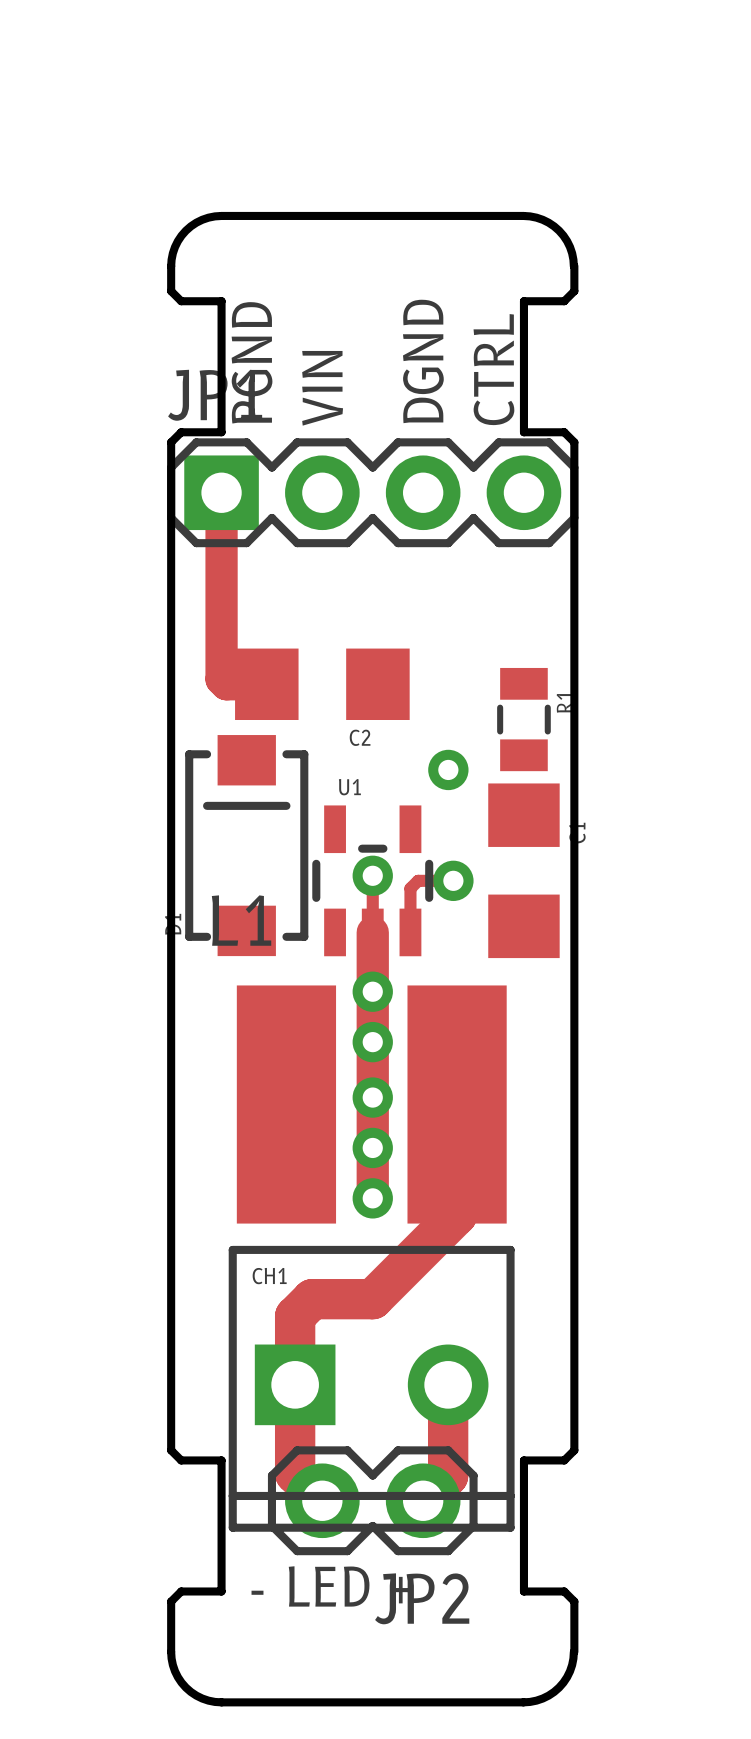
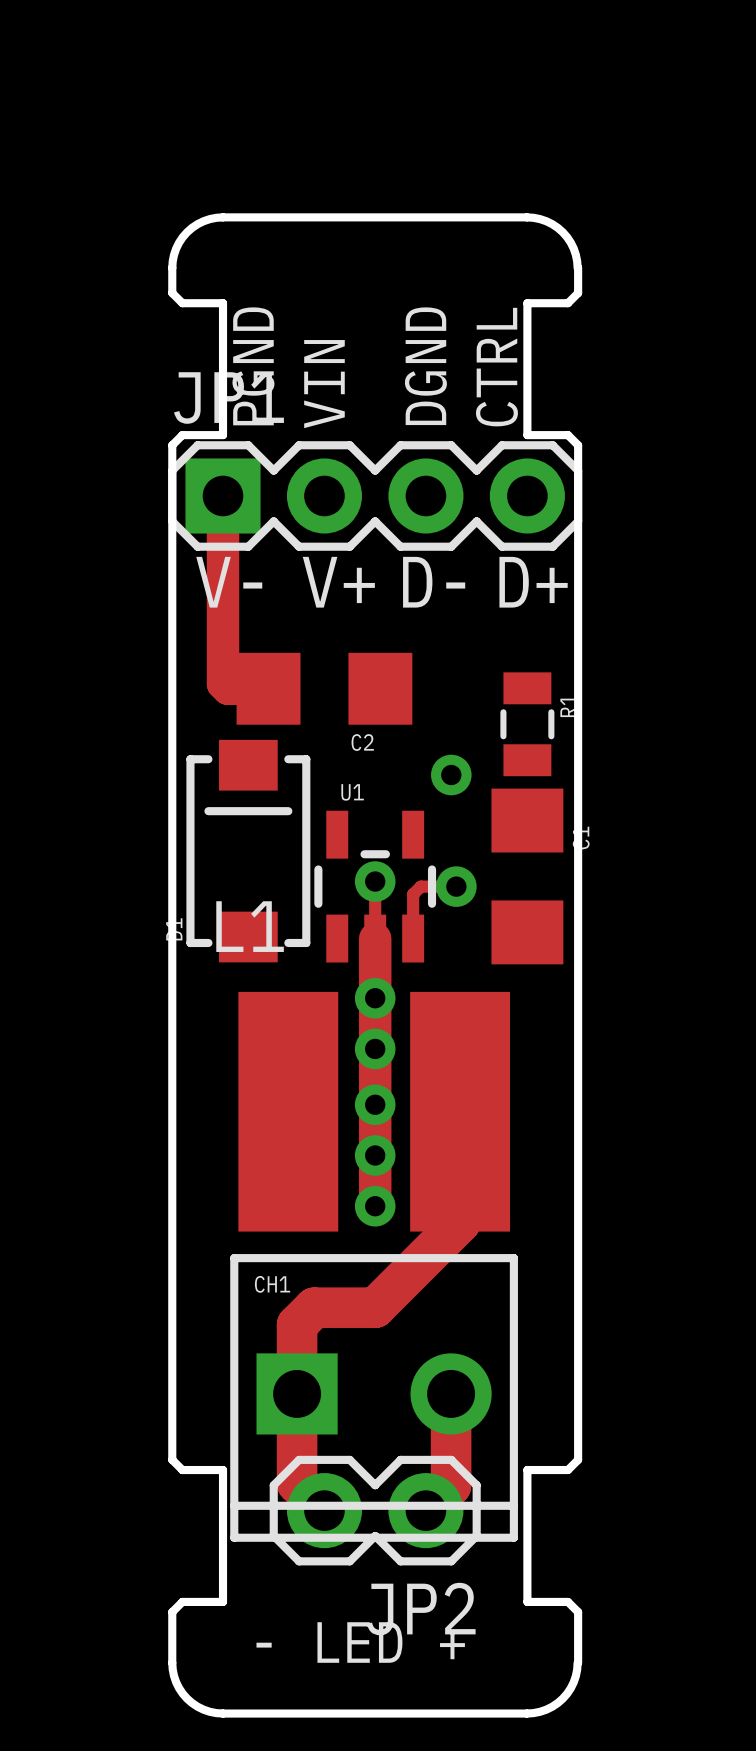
text: none -> V- (229, 582)
text: none -> V+ (338, 582)
text: none -> D- (434, 582)
text: none -> D+ (533, 582)
text position: - LED + (331, 1586) -> - LED + (360, 1642)

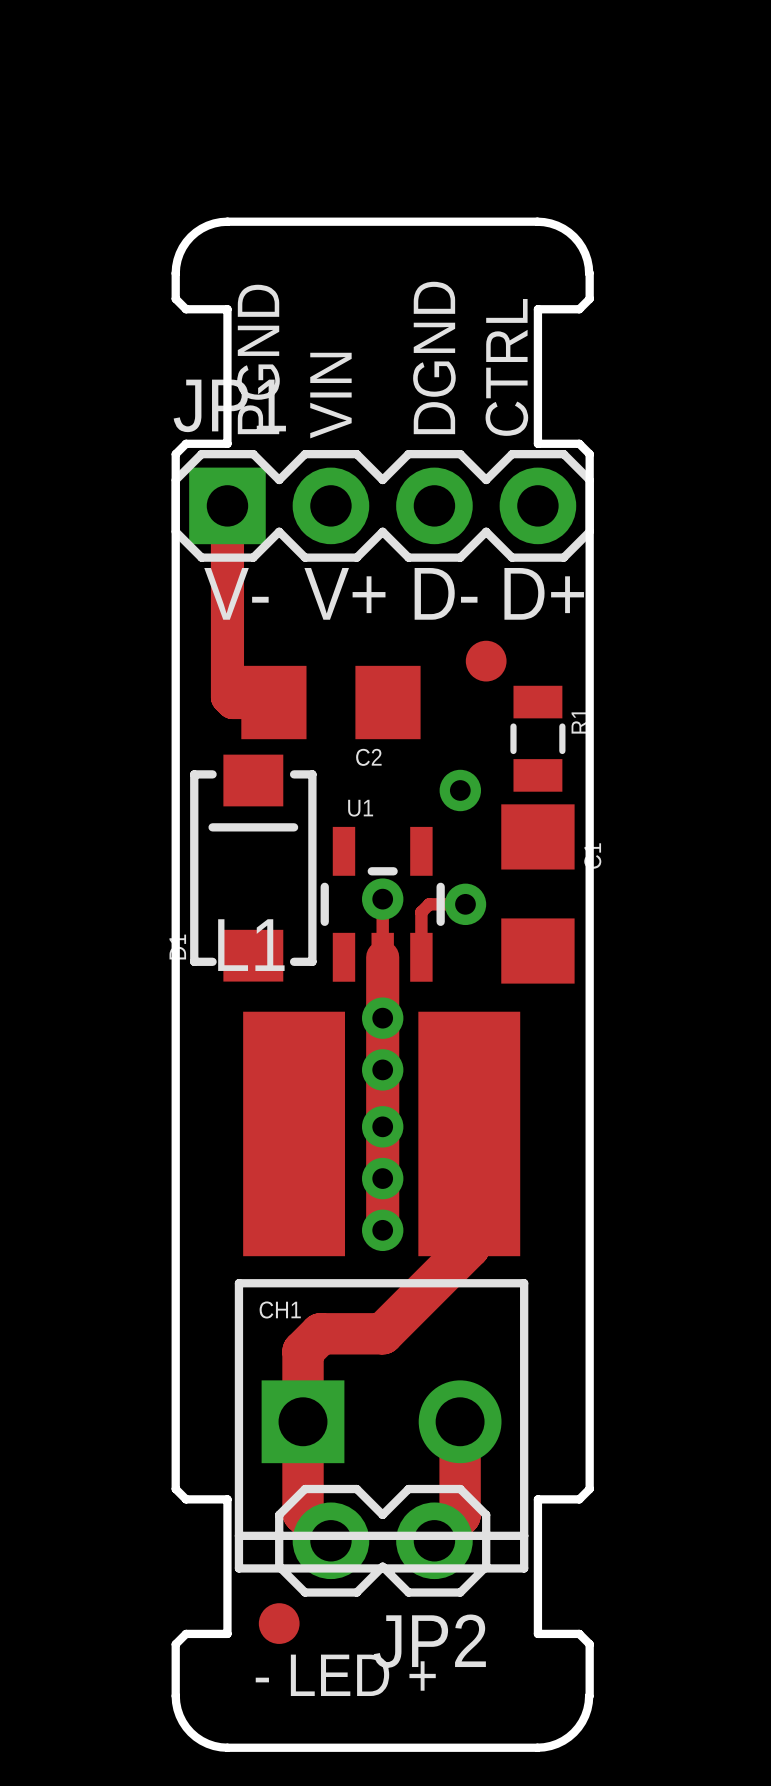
part: none -> (486, 661)
part: none -> (279, 1623)

